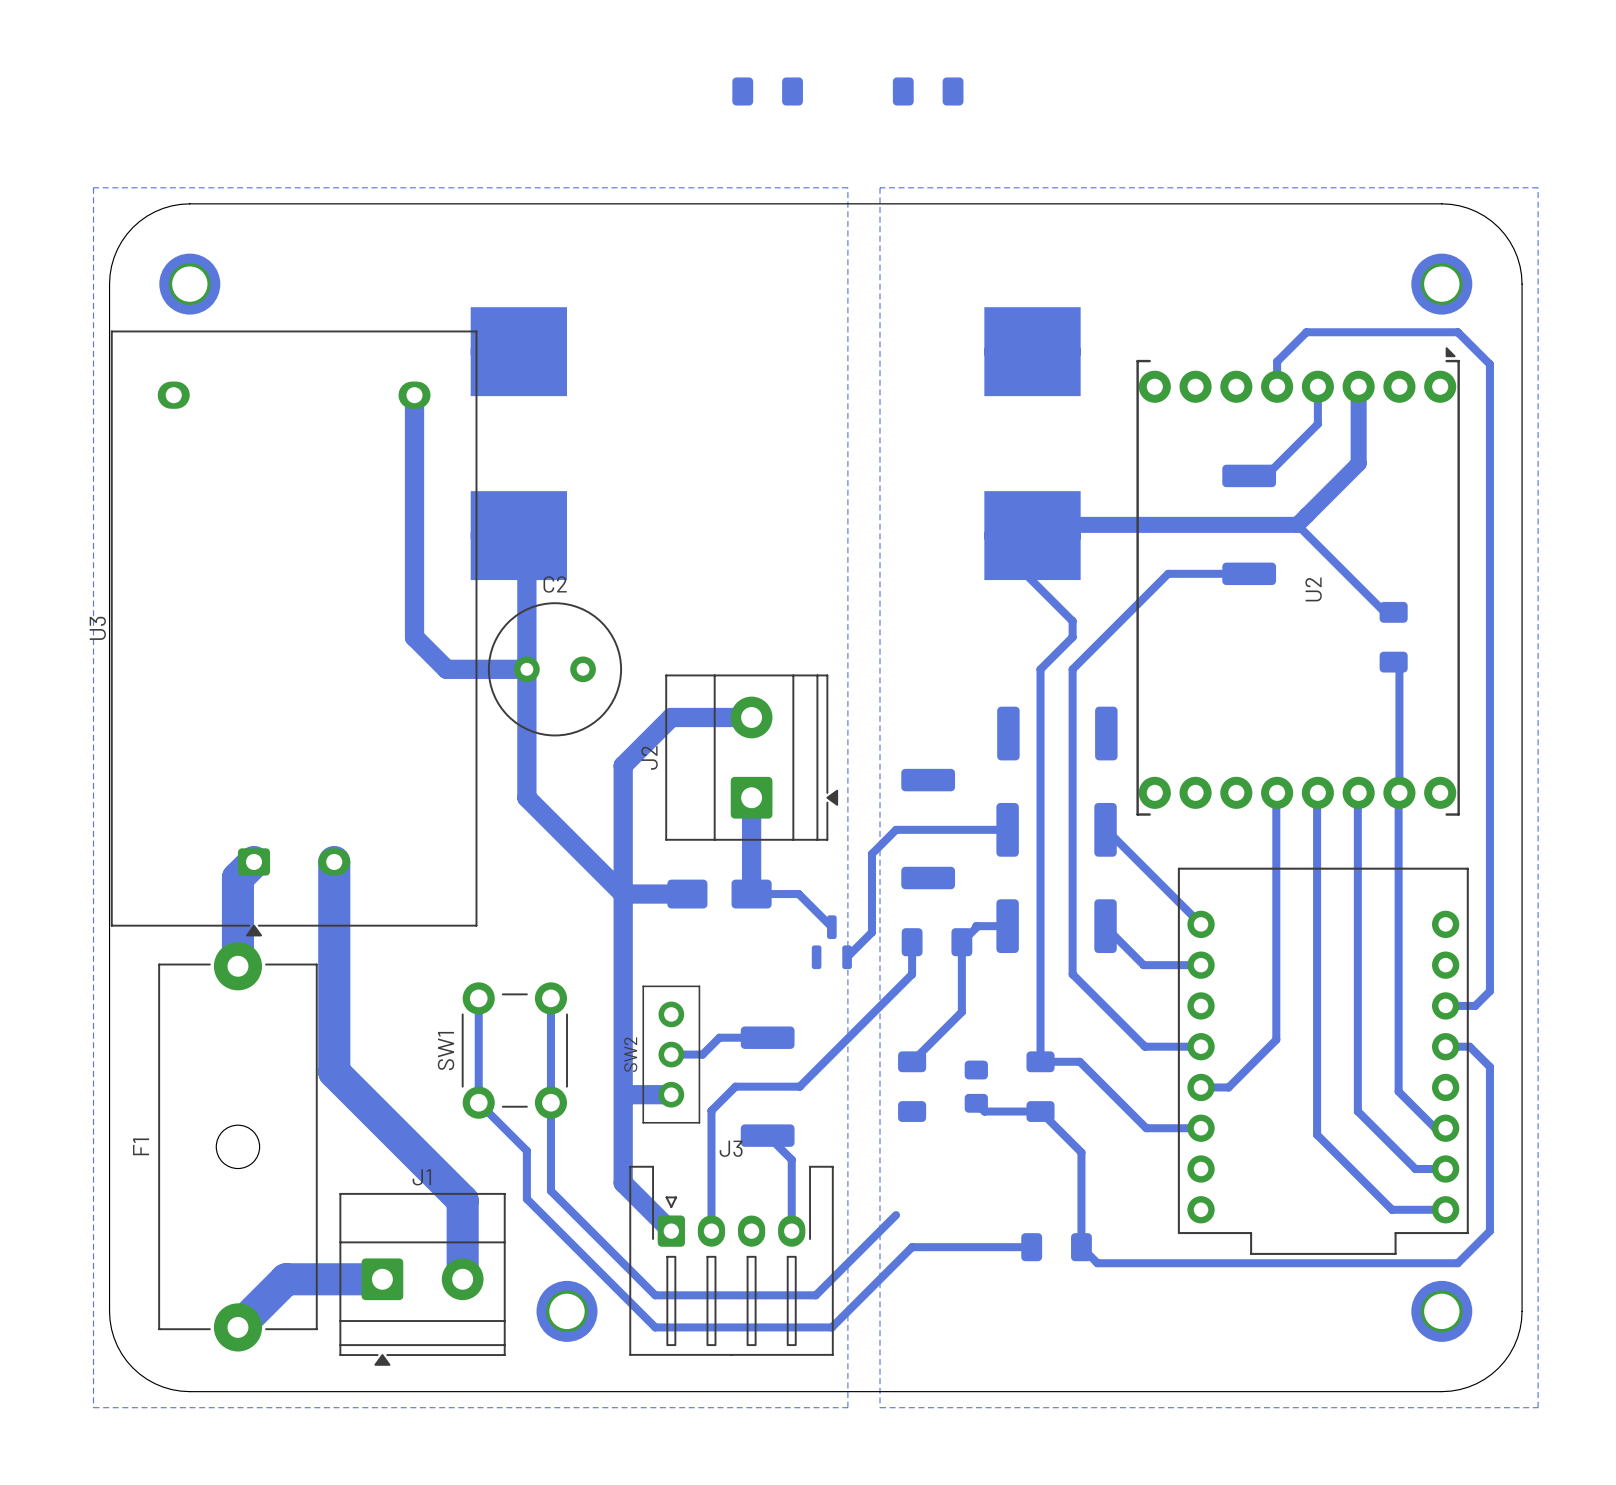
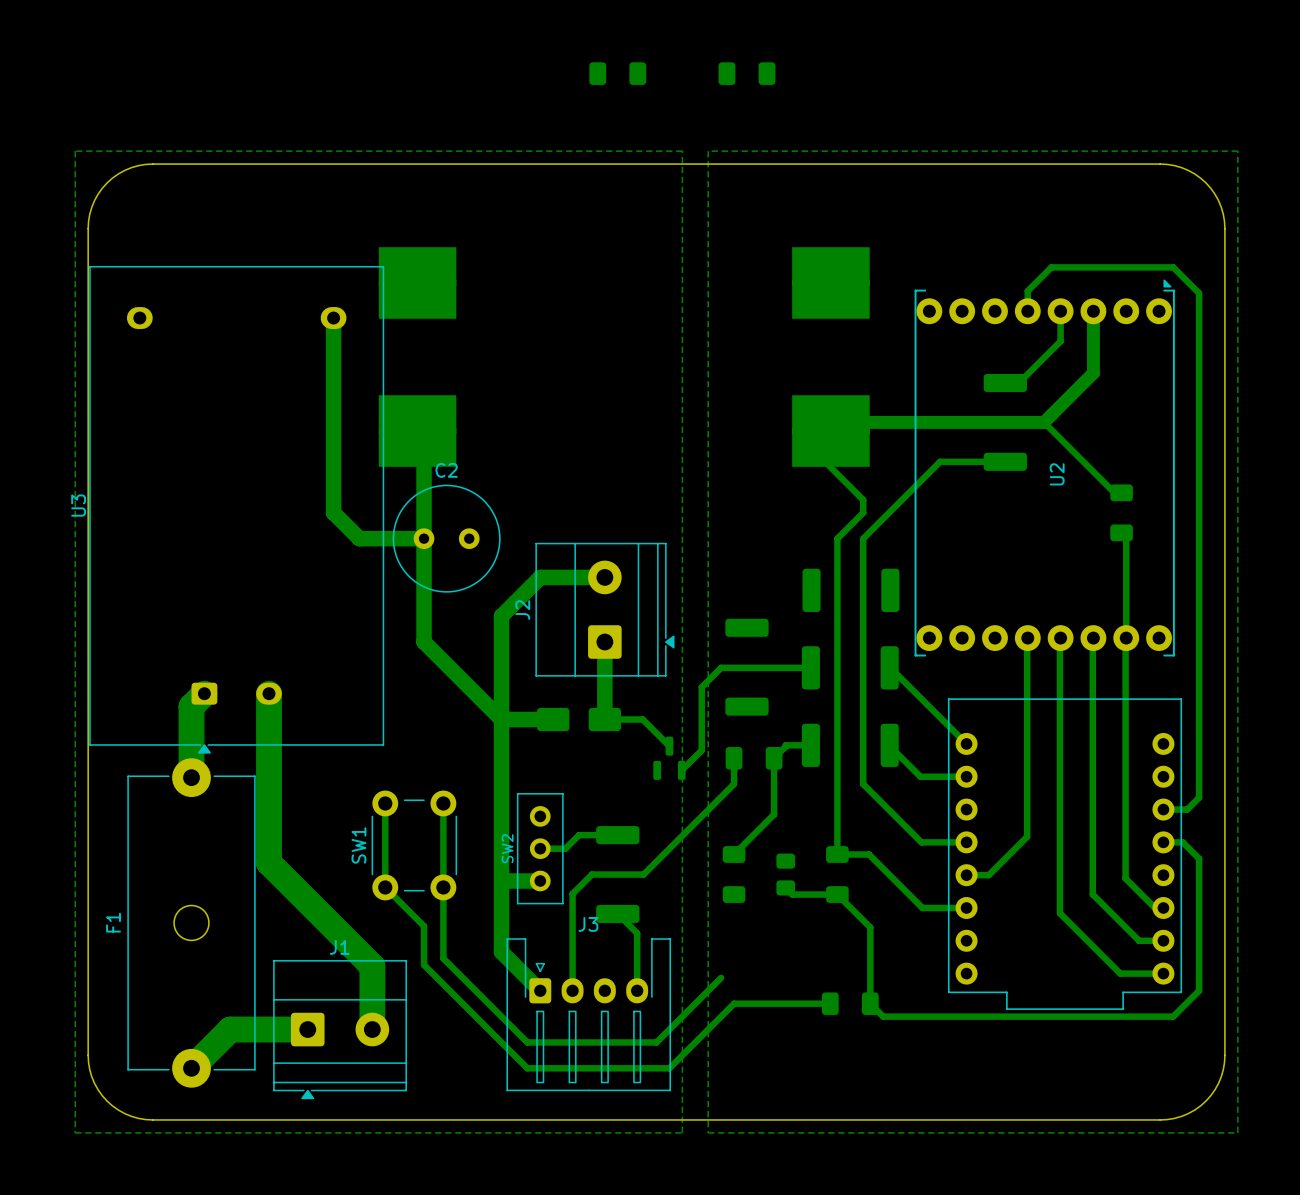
part: (189, 284) -> none
part: (1441, 284) -> none
part: (567, 1311) -> none
part: (1441, 1311) -> none

